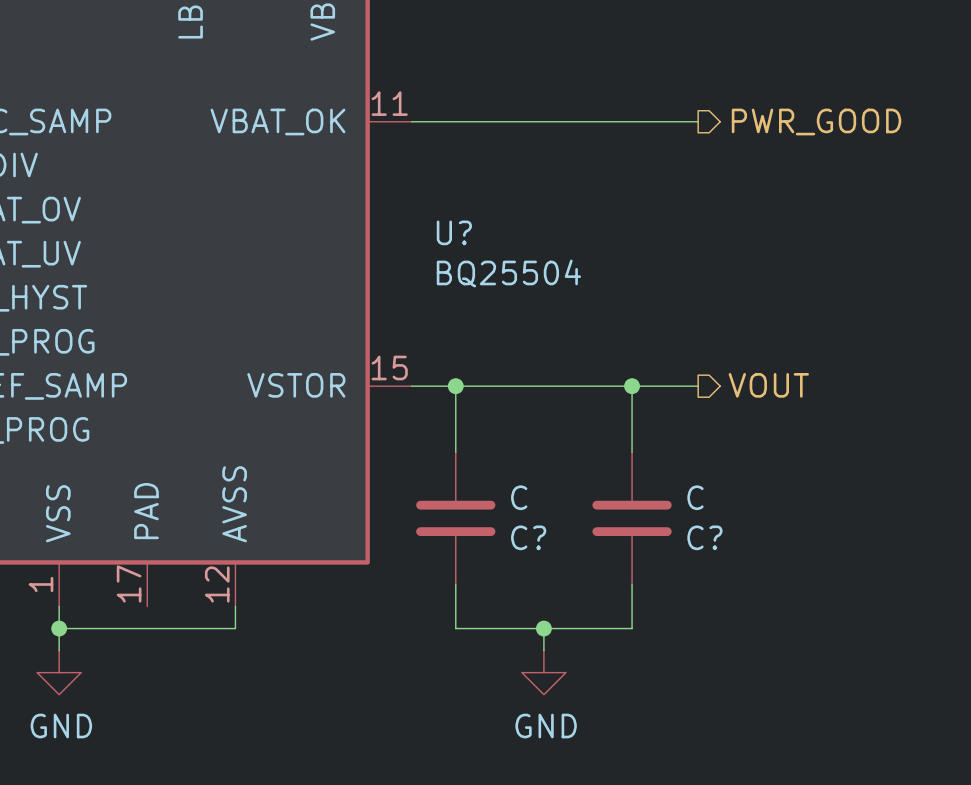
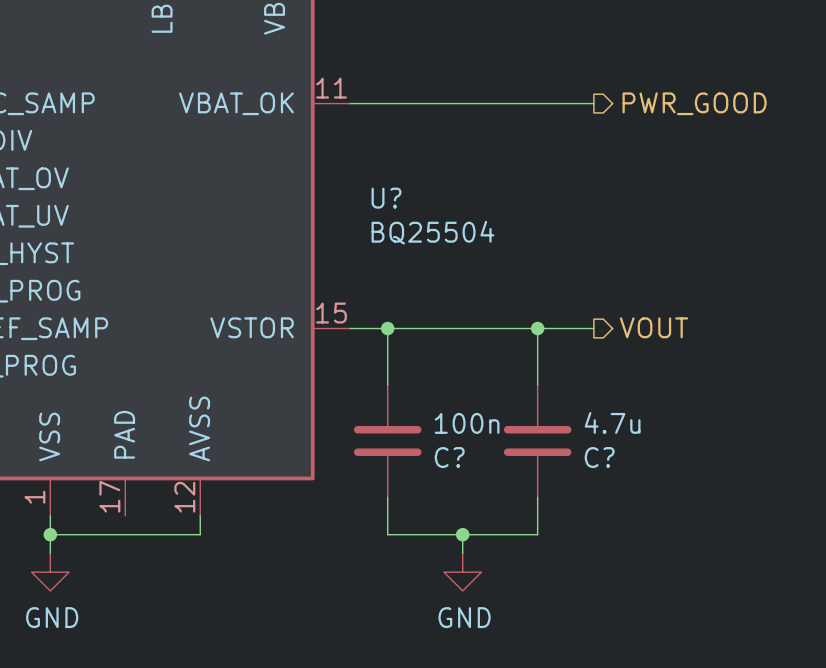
C? value: C (519, 497) -> 100n (467, 423)
C? value: C (695, 497) -> 4.7u (612, 422)

